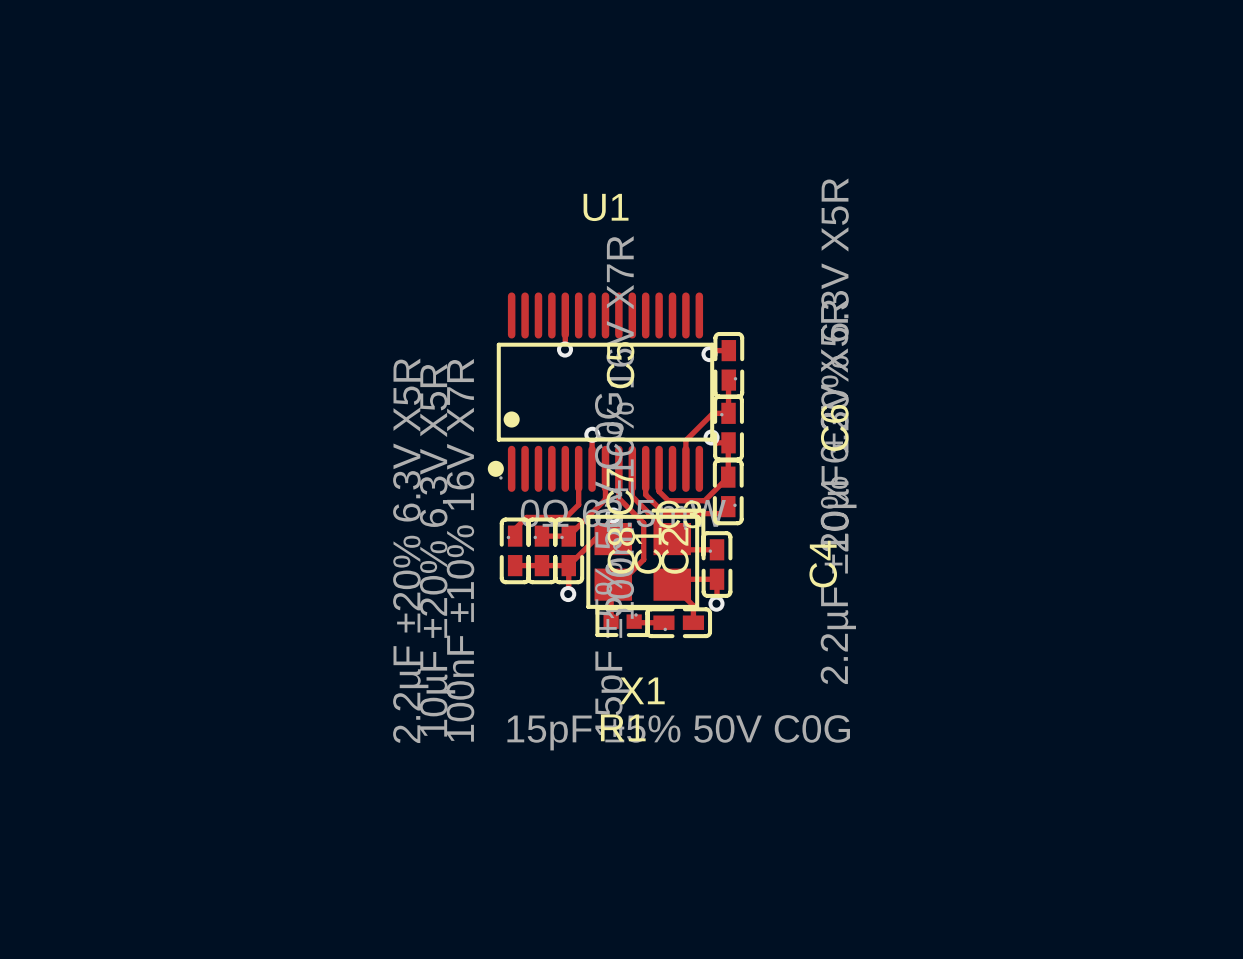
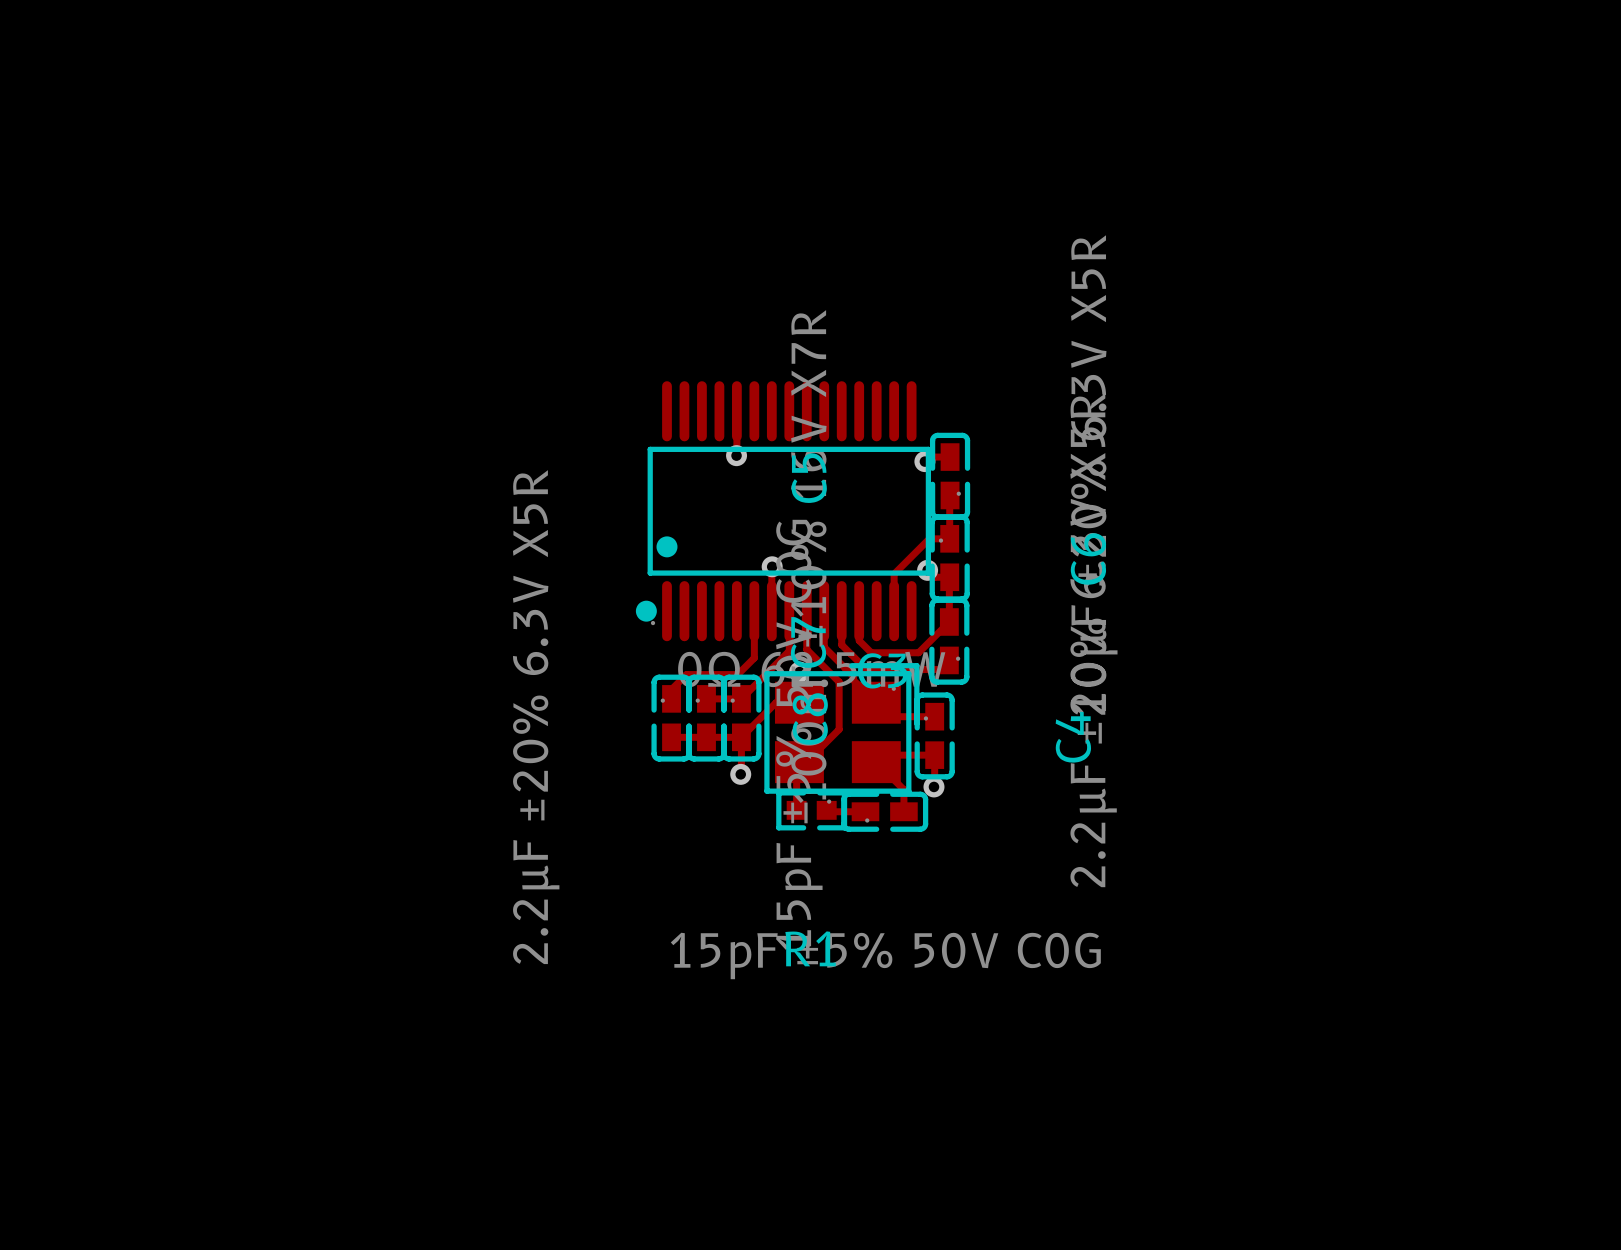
U1 name: U1 (606, 207) -> none
C1 value: 10µF ±20% 6.3V X5R (437, 550) -> none
C2 value: 100nF ±10% 16V X7R (460, 550) -> none
C1 name: C1 (648, 550) -> none
C2 name: C2 (674, 550) -> none
X1 name: X1 (642, 690) -> none

